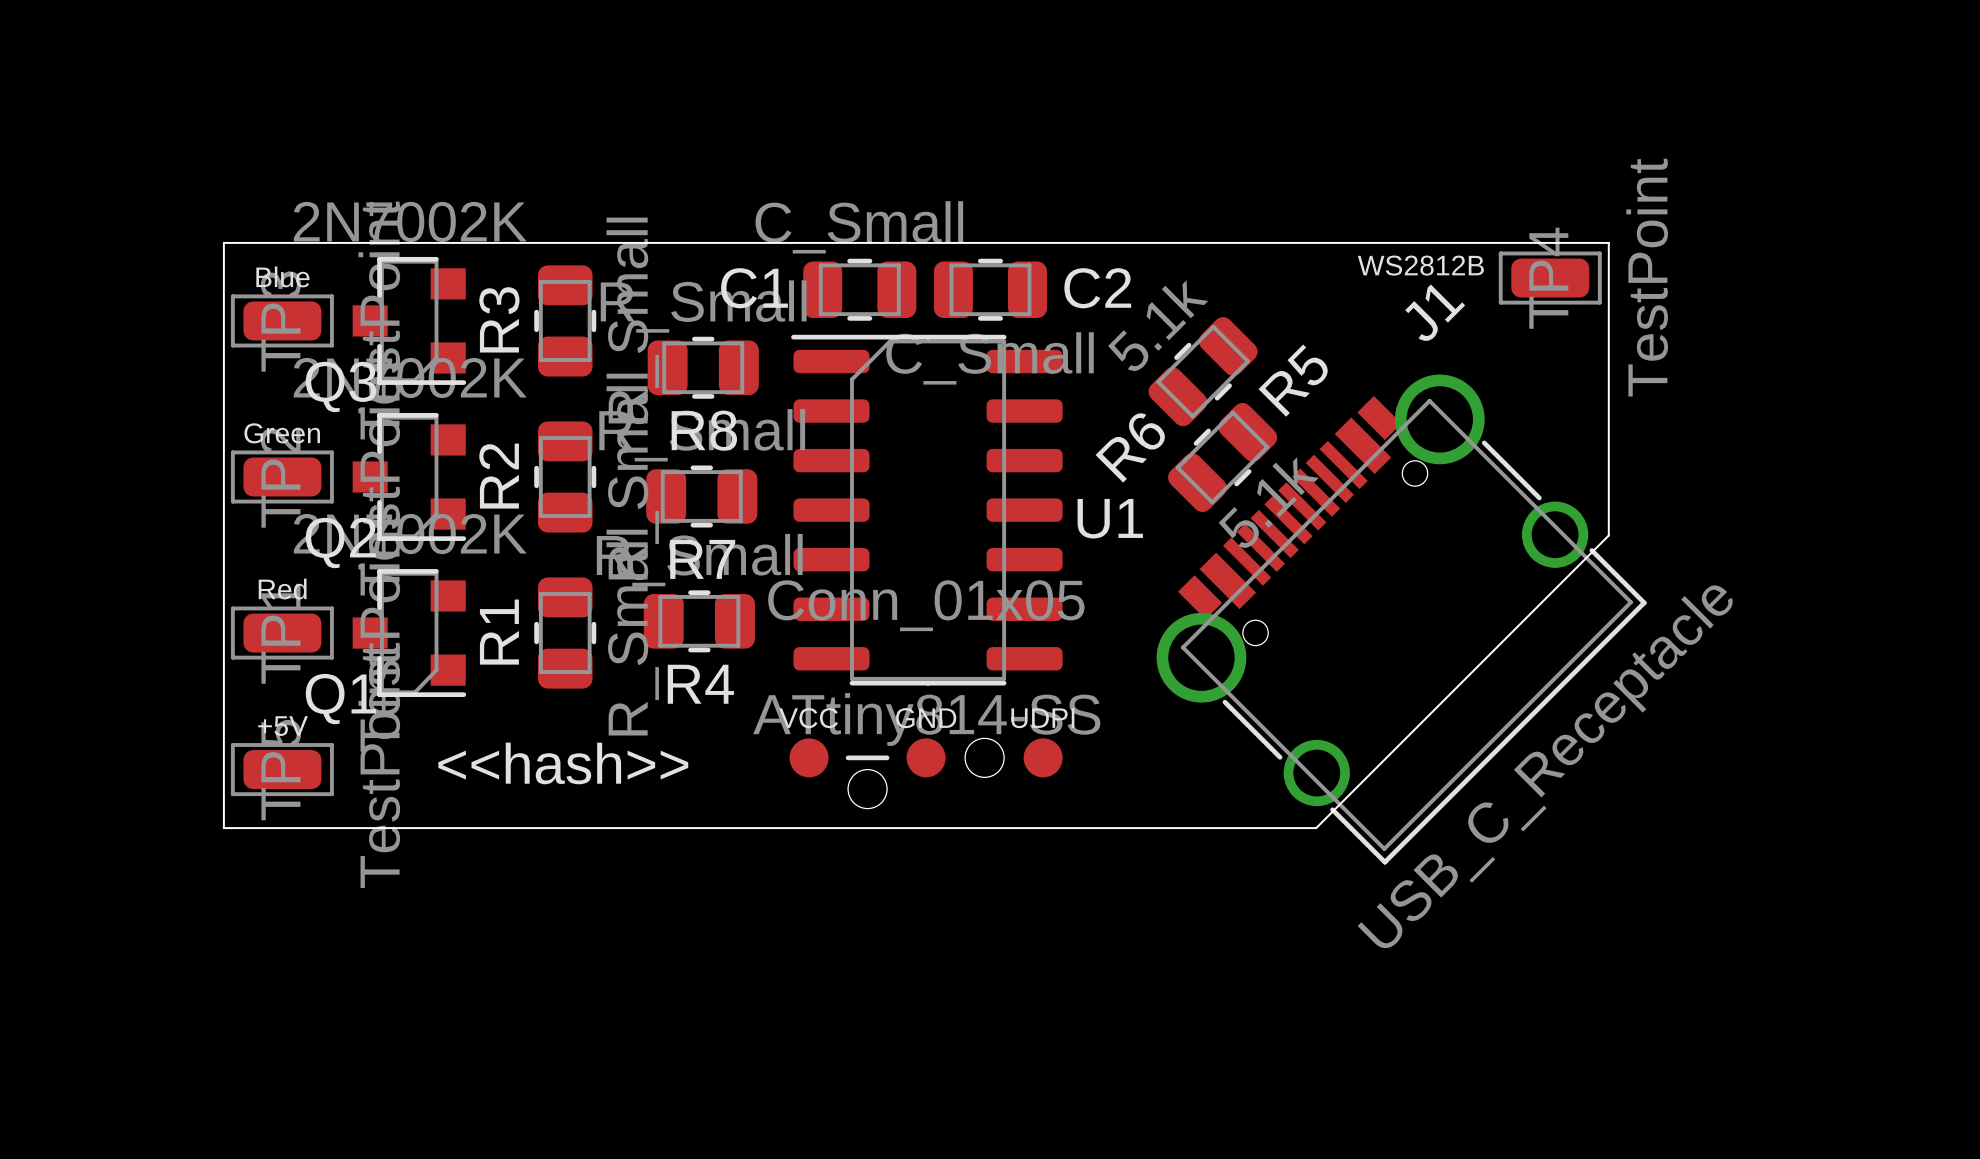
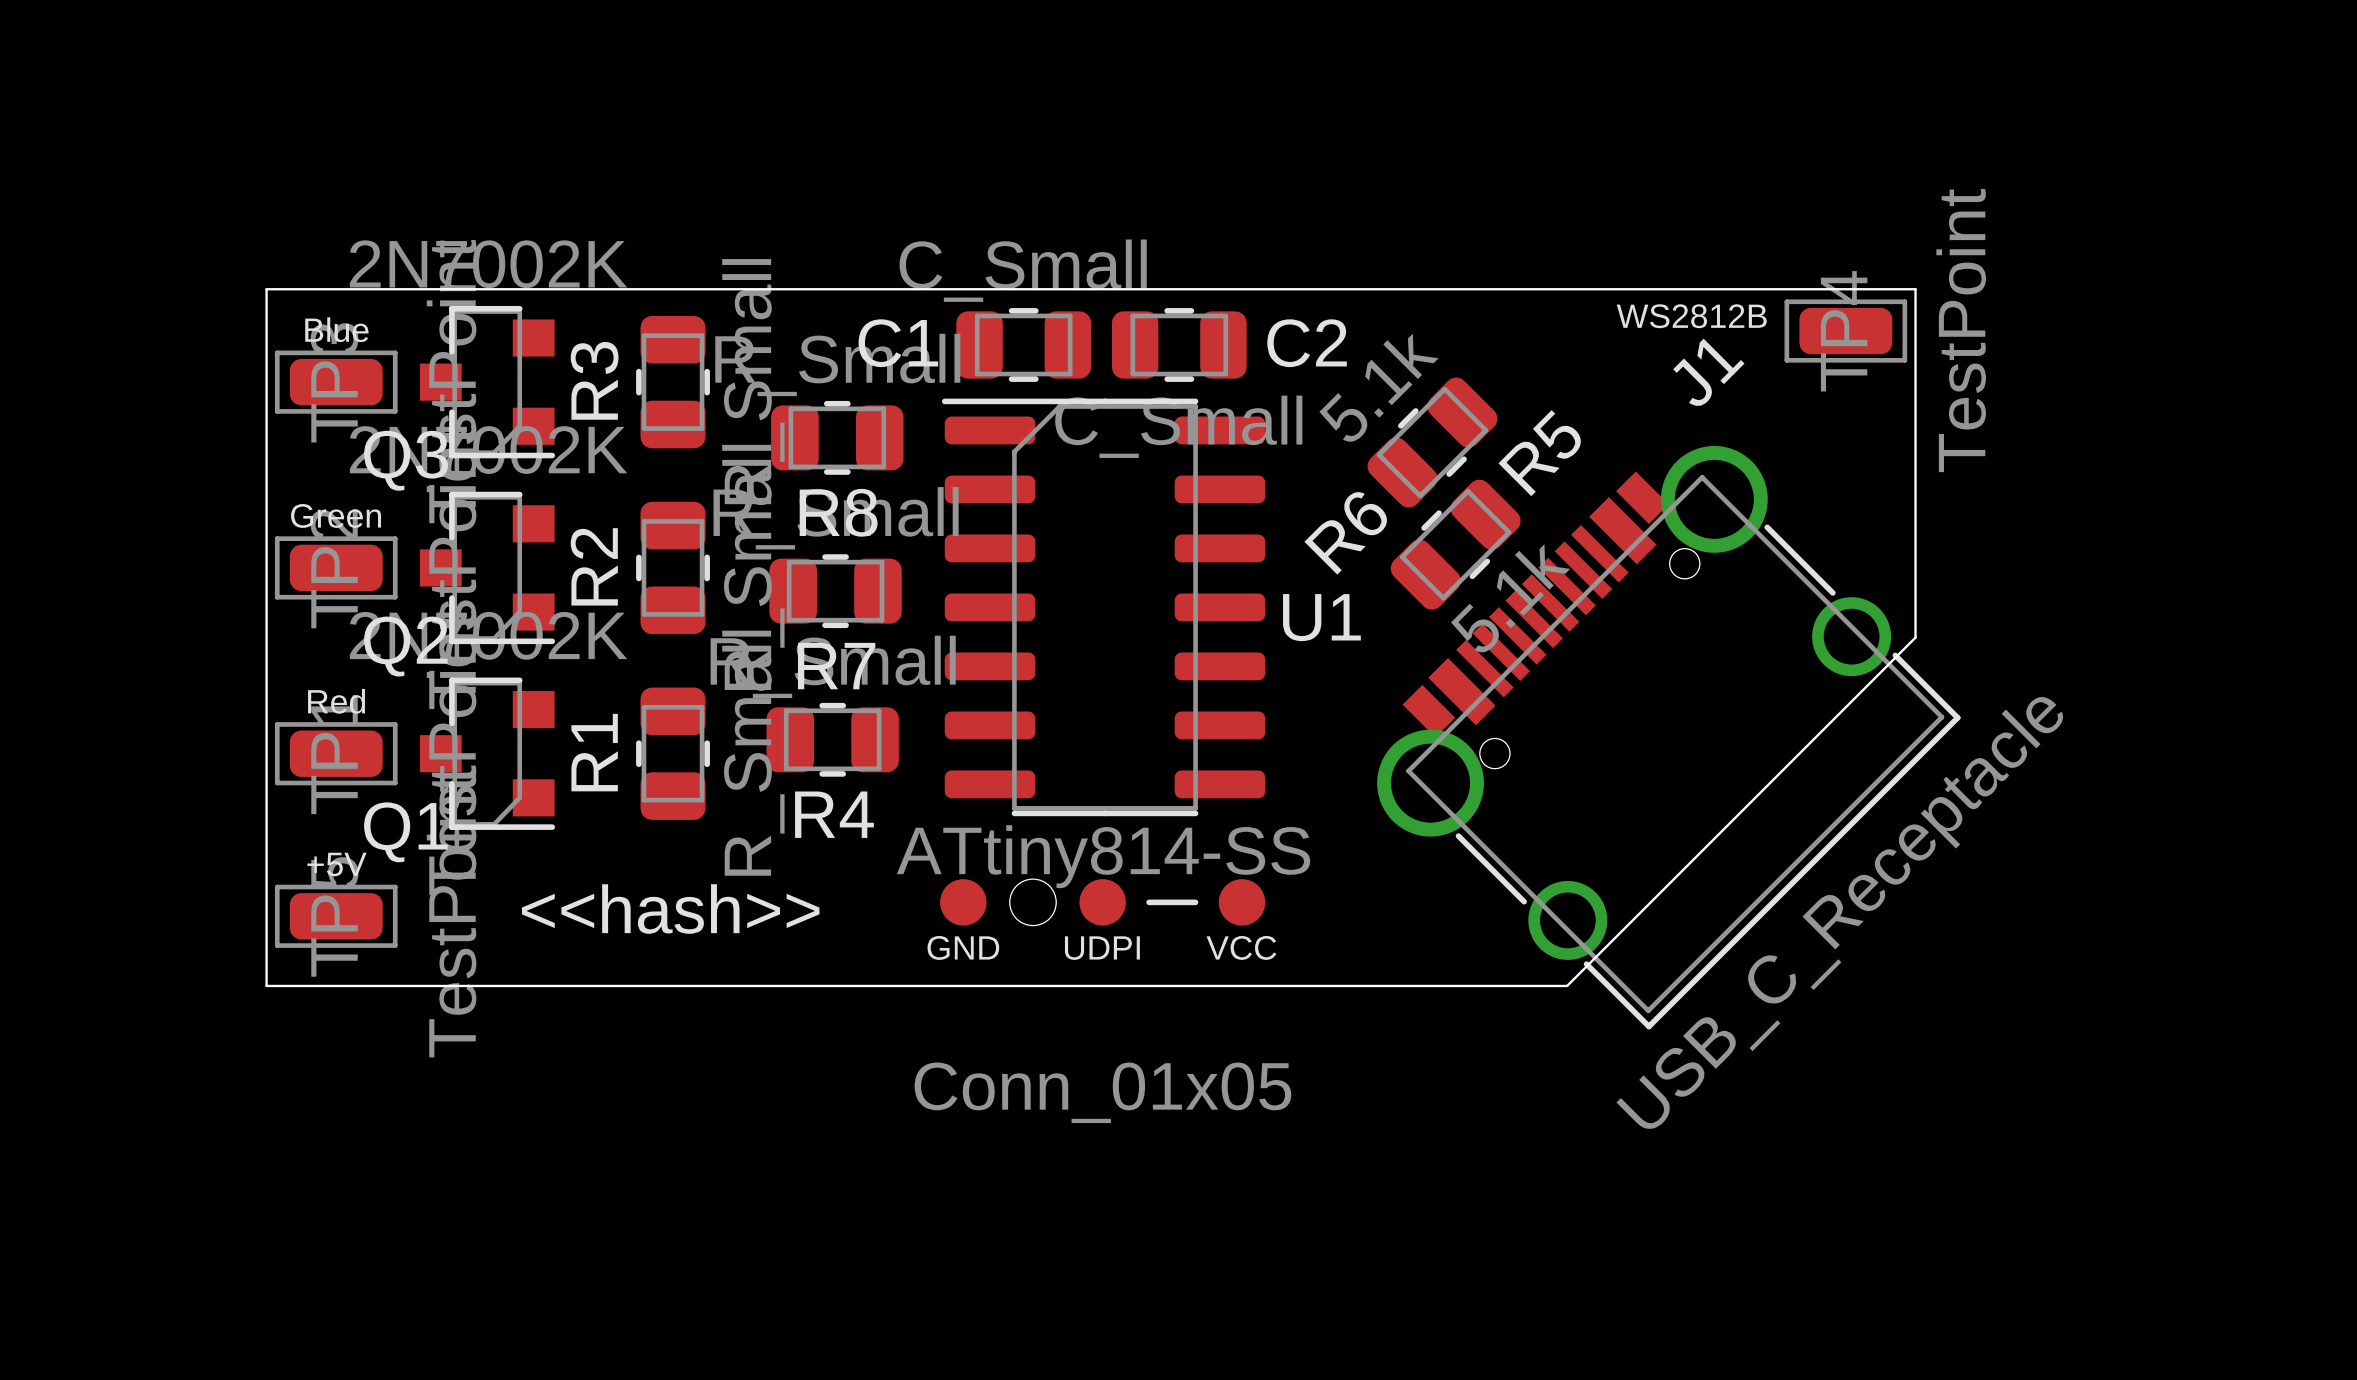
part value position: Conn_01x05 (926, 605) -> Conn_01x05 (1102, 1092)
part footprint: [789, 738, 1063, 809] -> [940, 879, 1266, 926]

